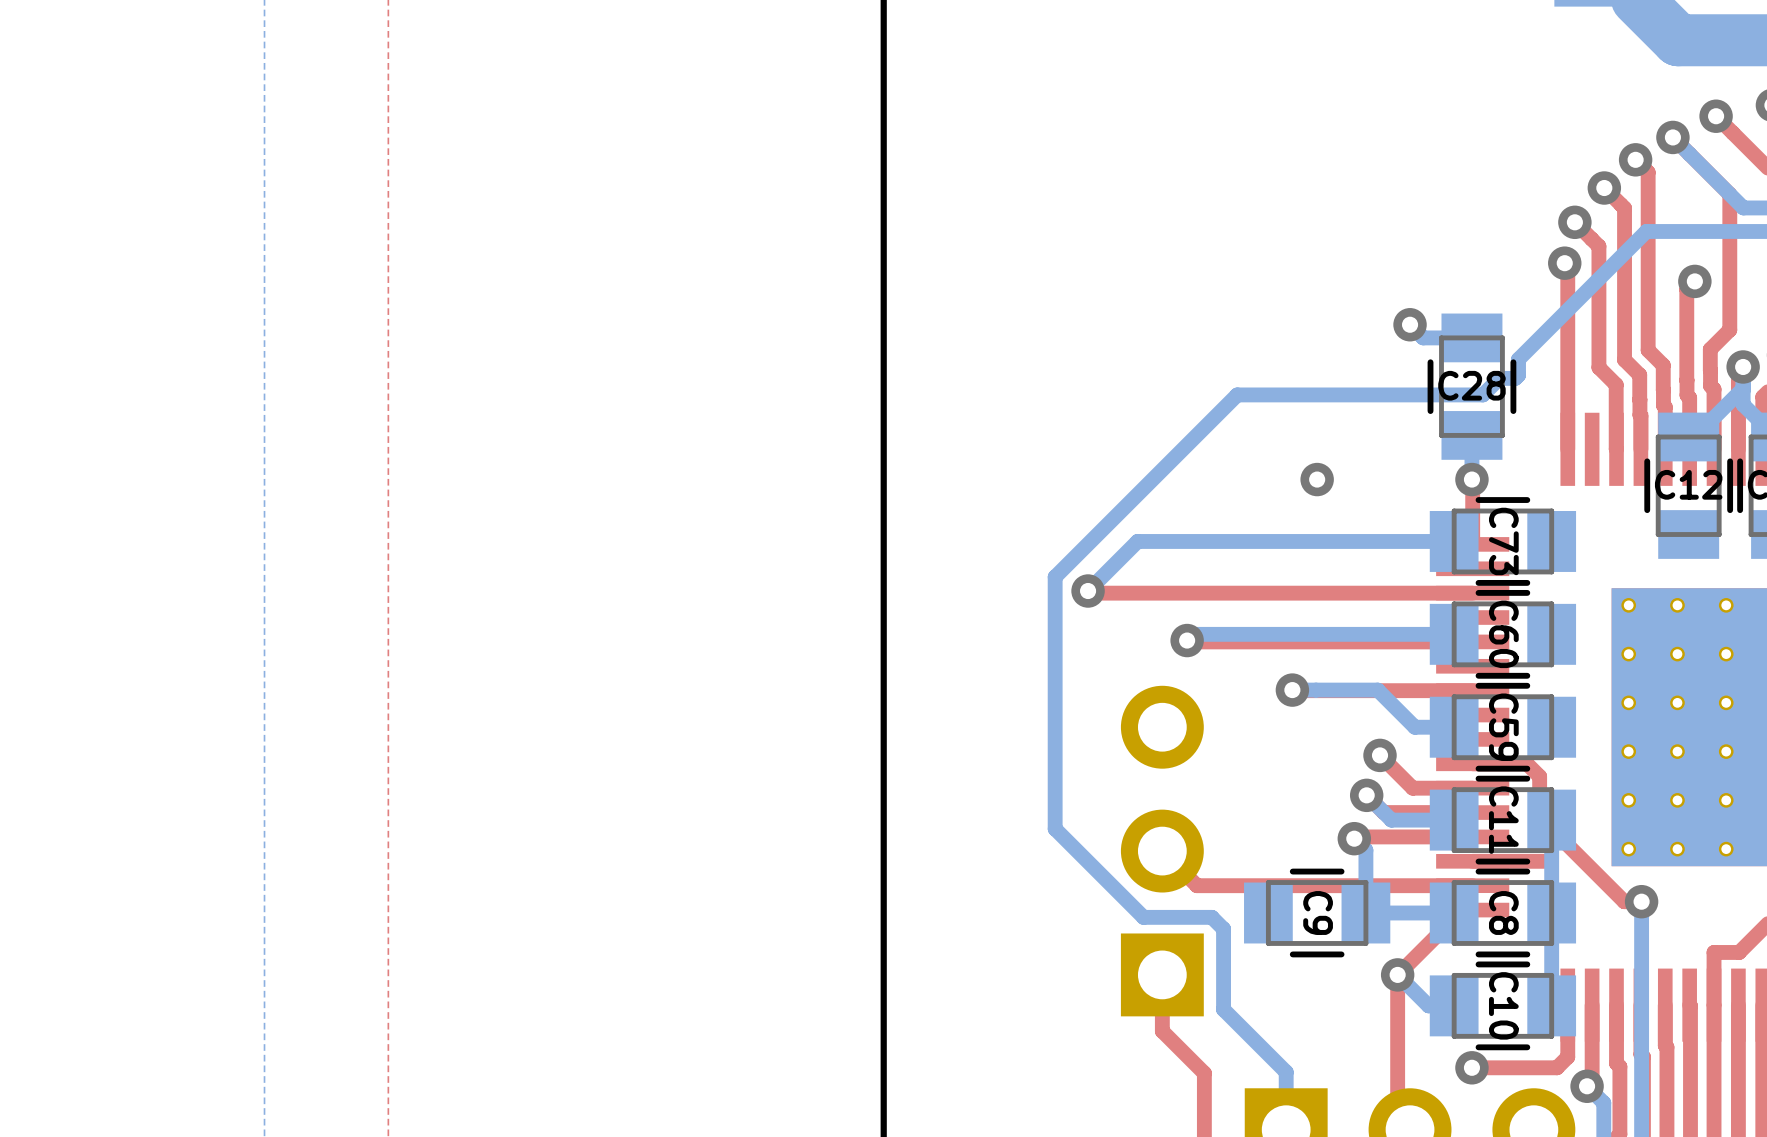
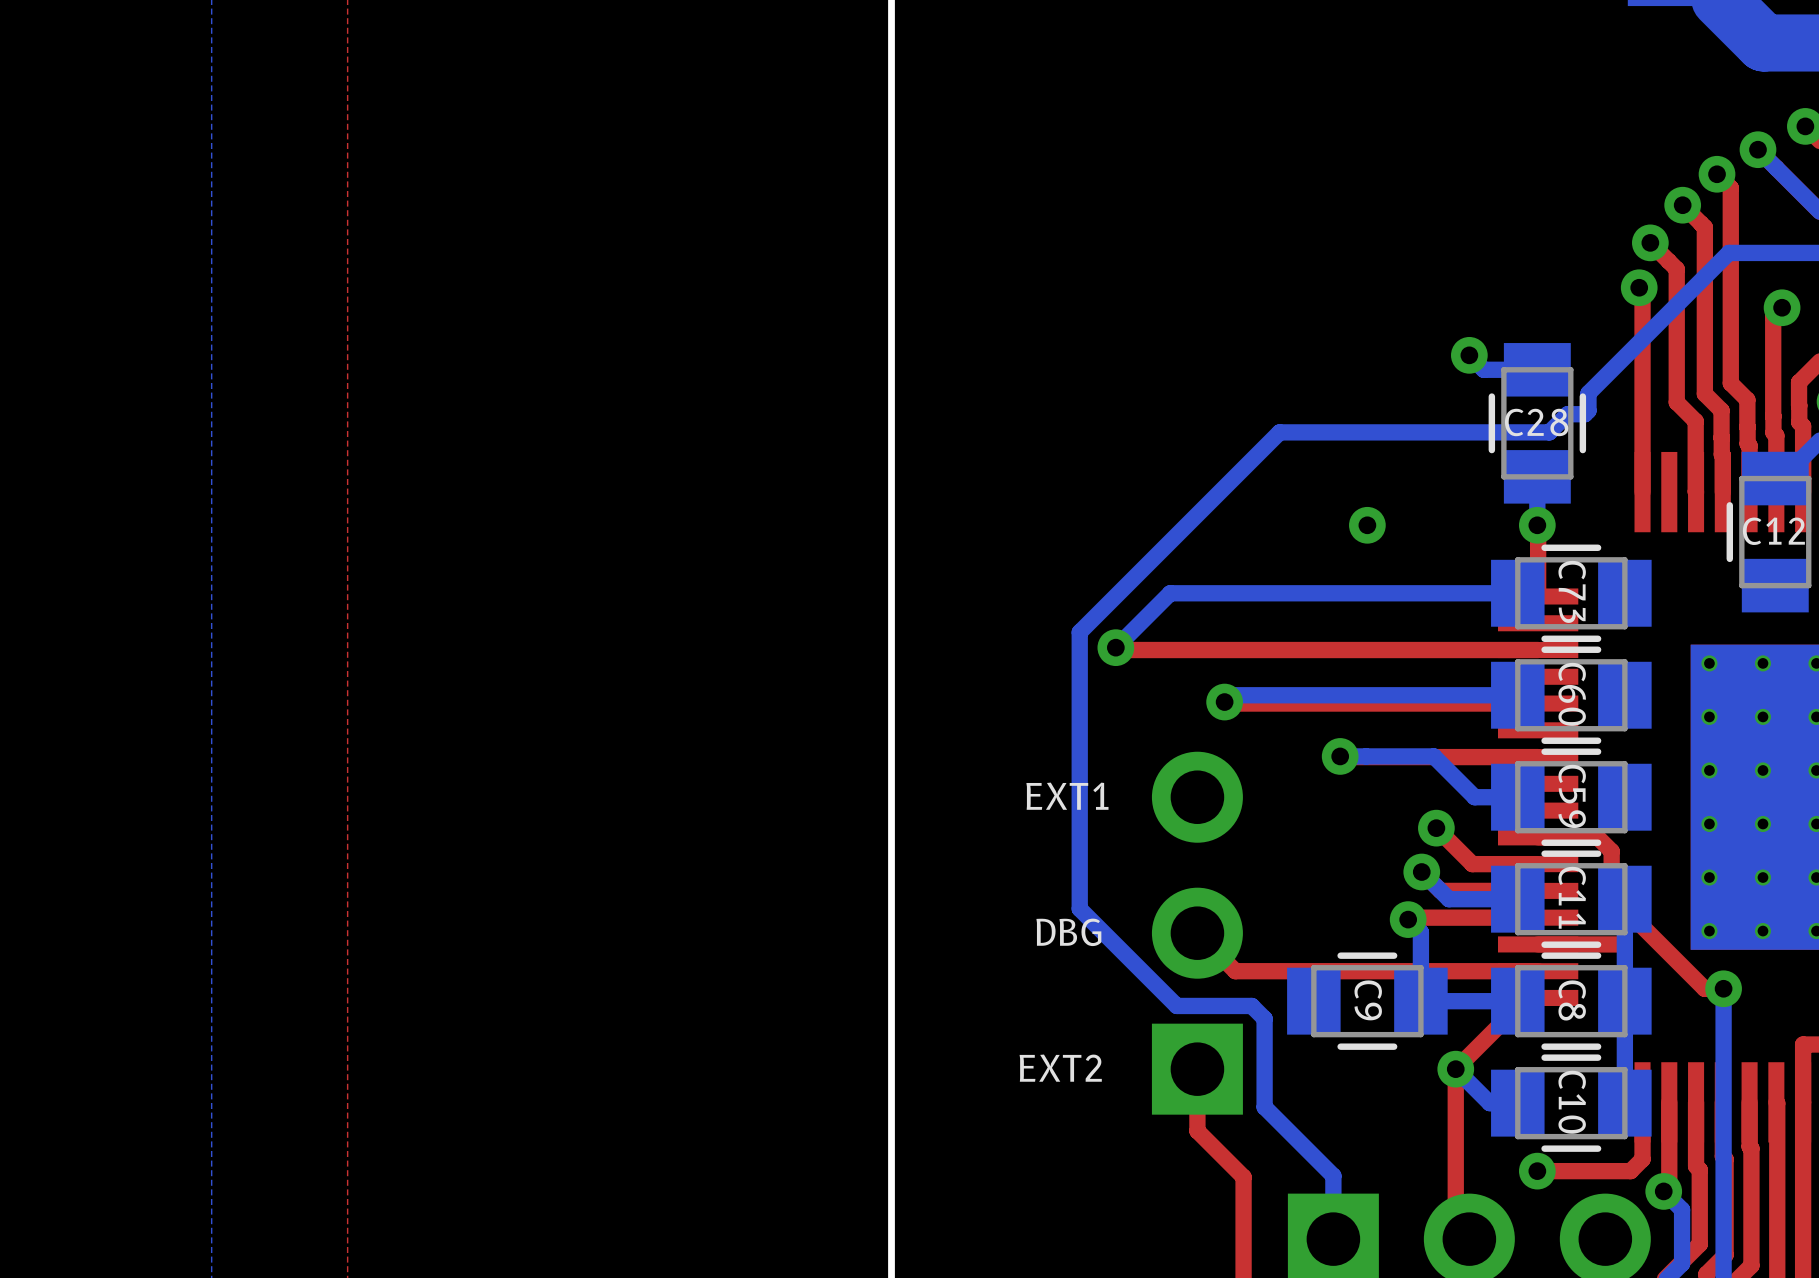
text: none -> EXT1 (1067, 796)
text: none -> DBG (1068, 932)
text: none -> EXT2 (1060, 1068)

